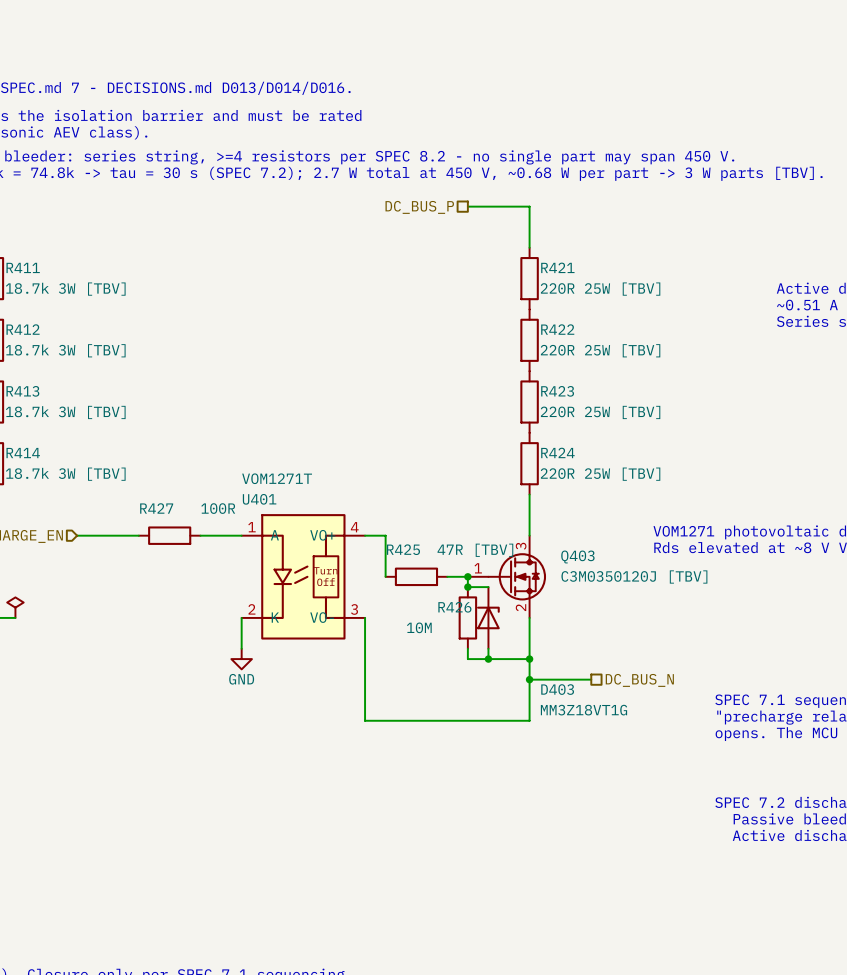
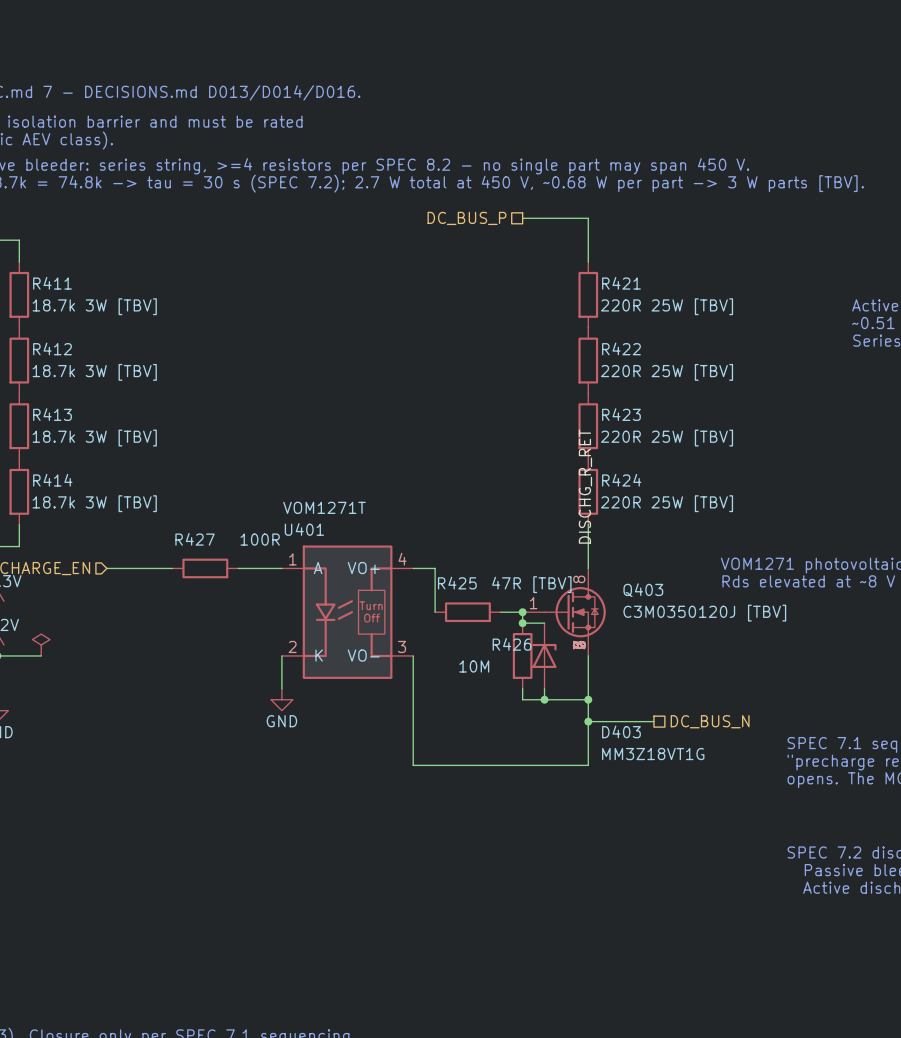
label: none -> DISCHG_R_RET (585, 486)
Q403 symbol: [467, 535, 547, 618] -> [522, 568, 606, 656]

